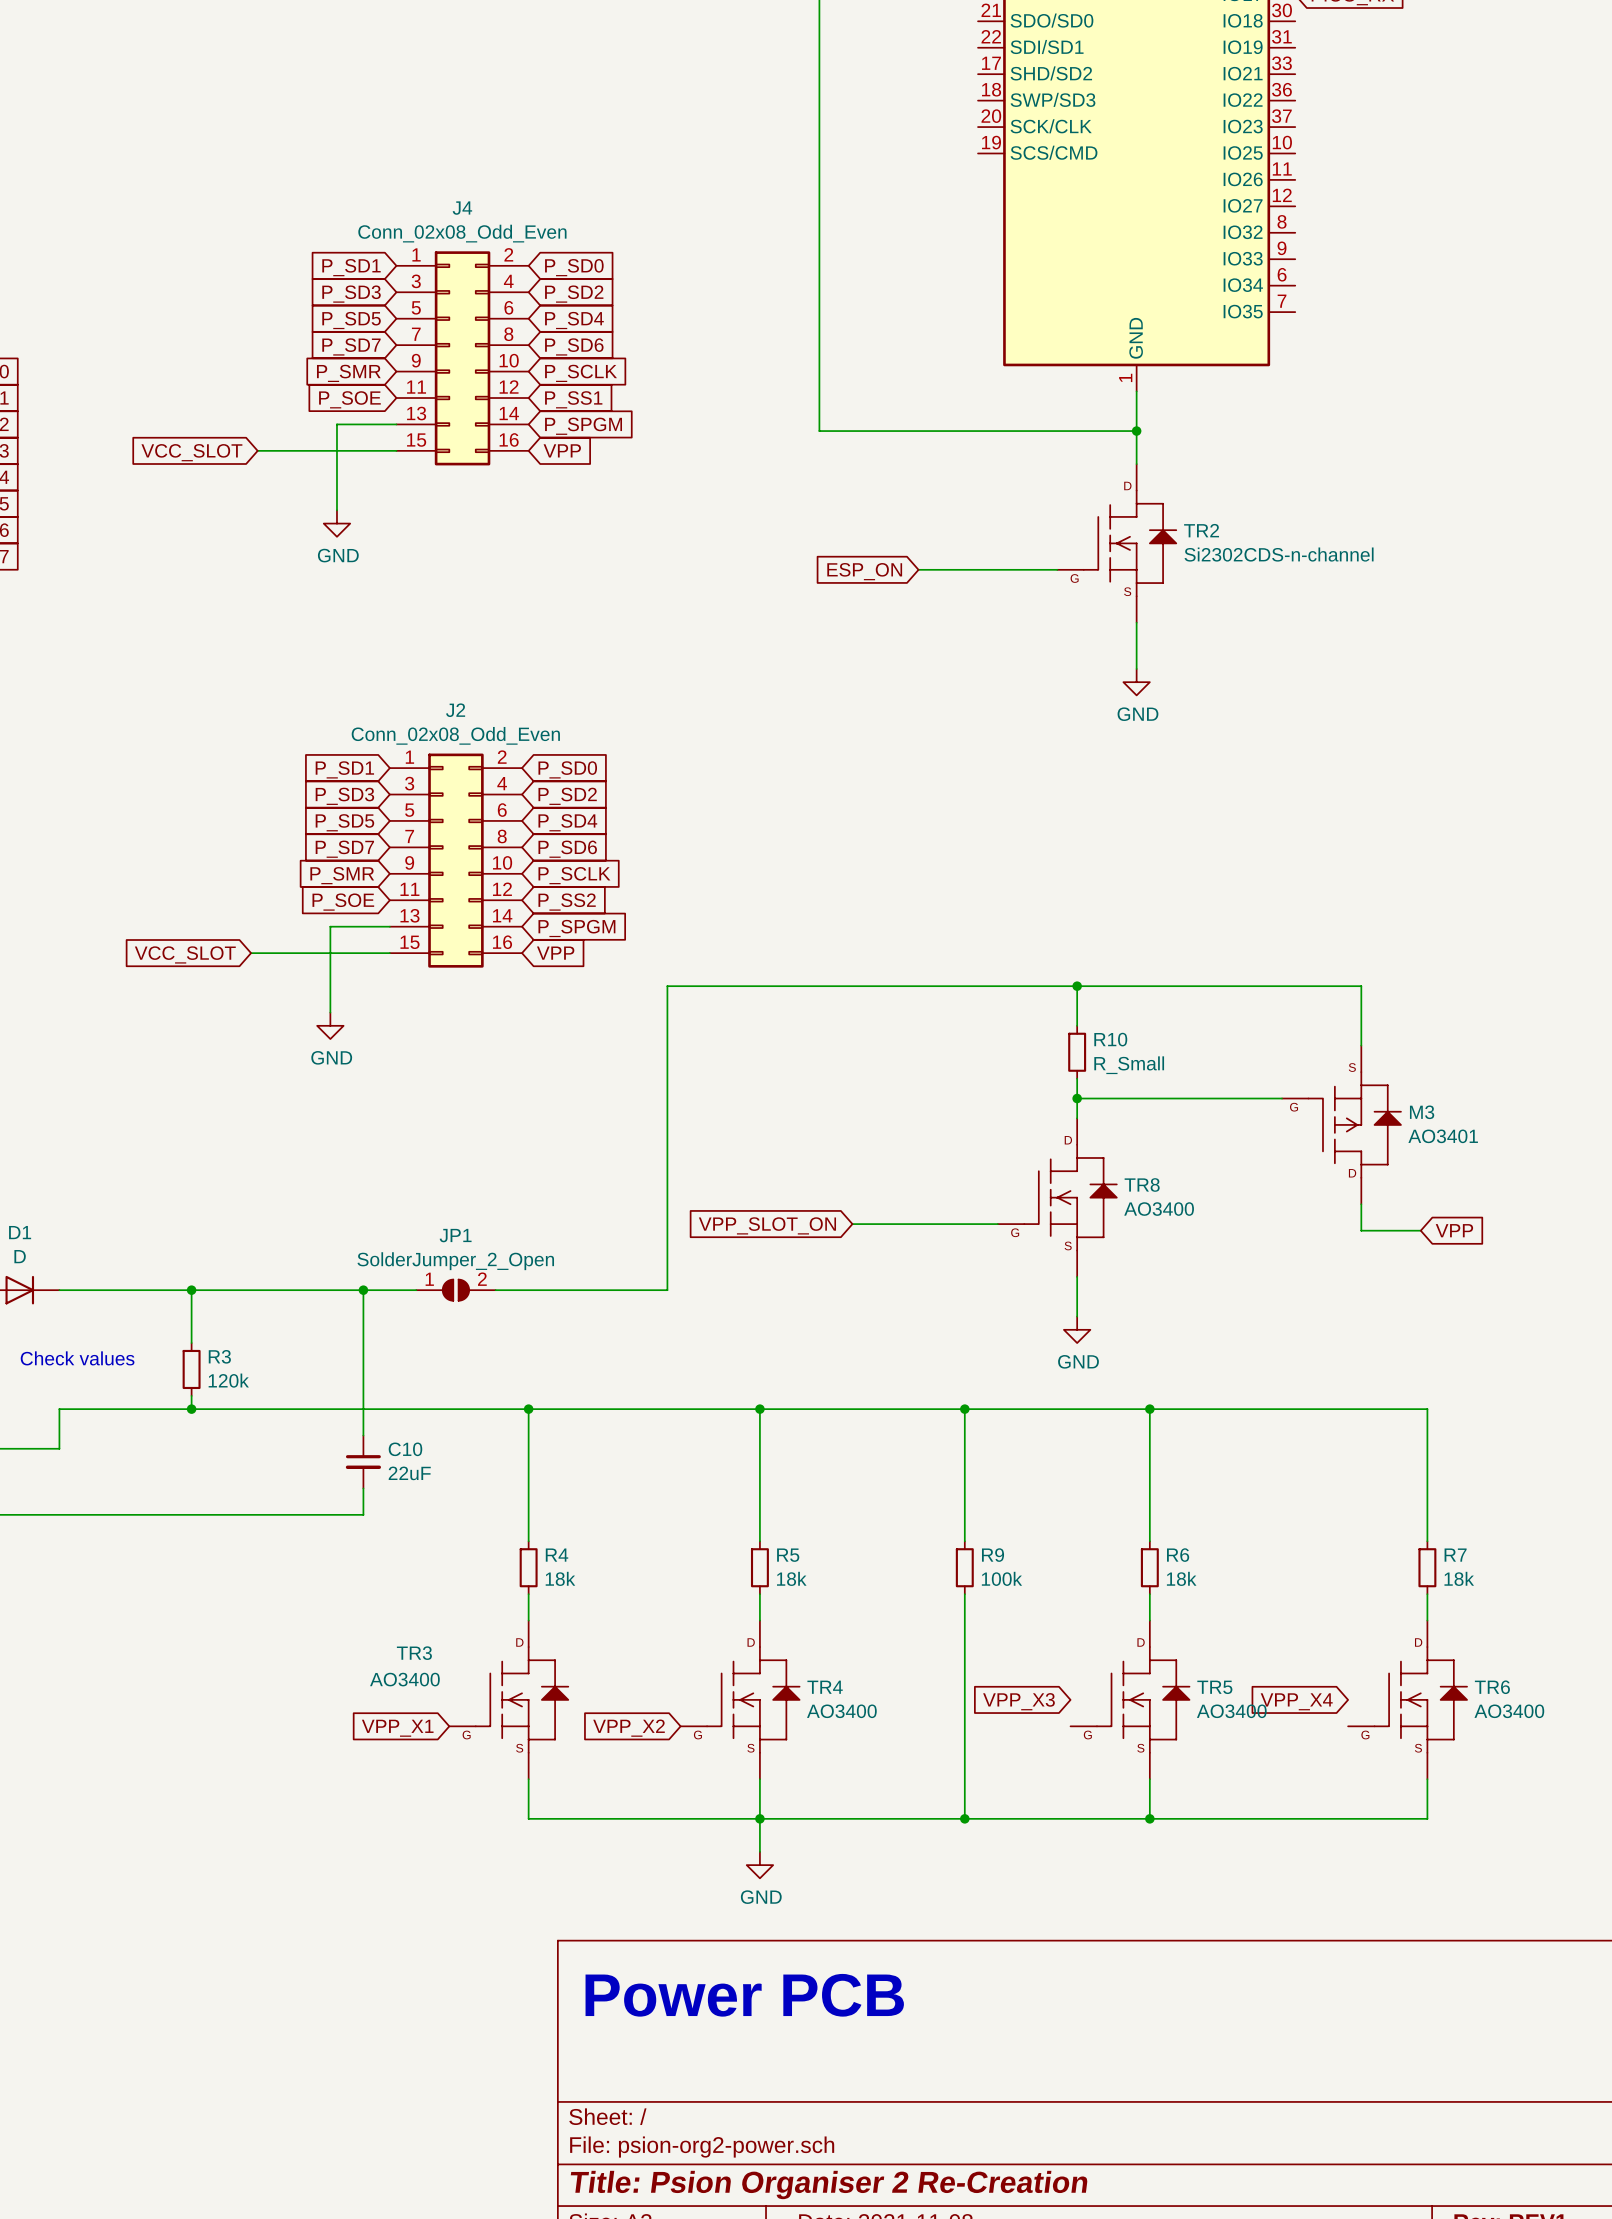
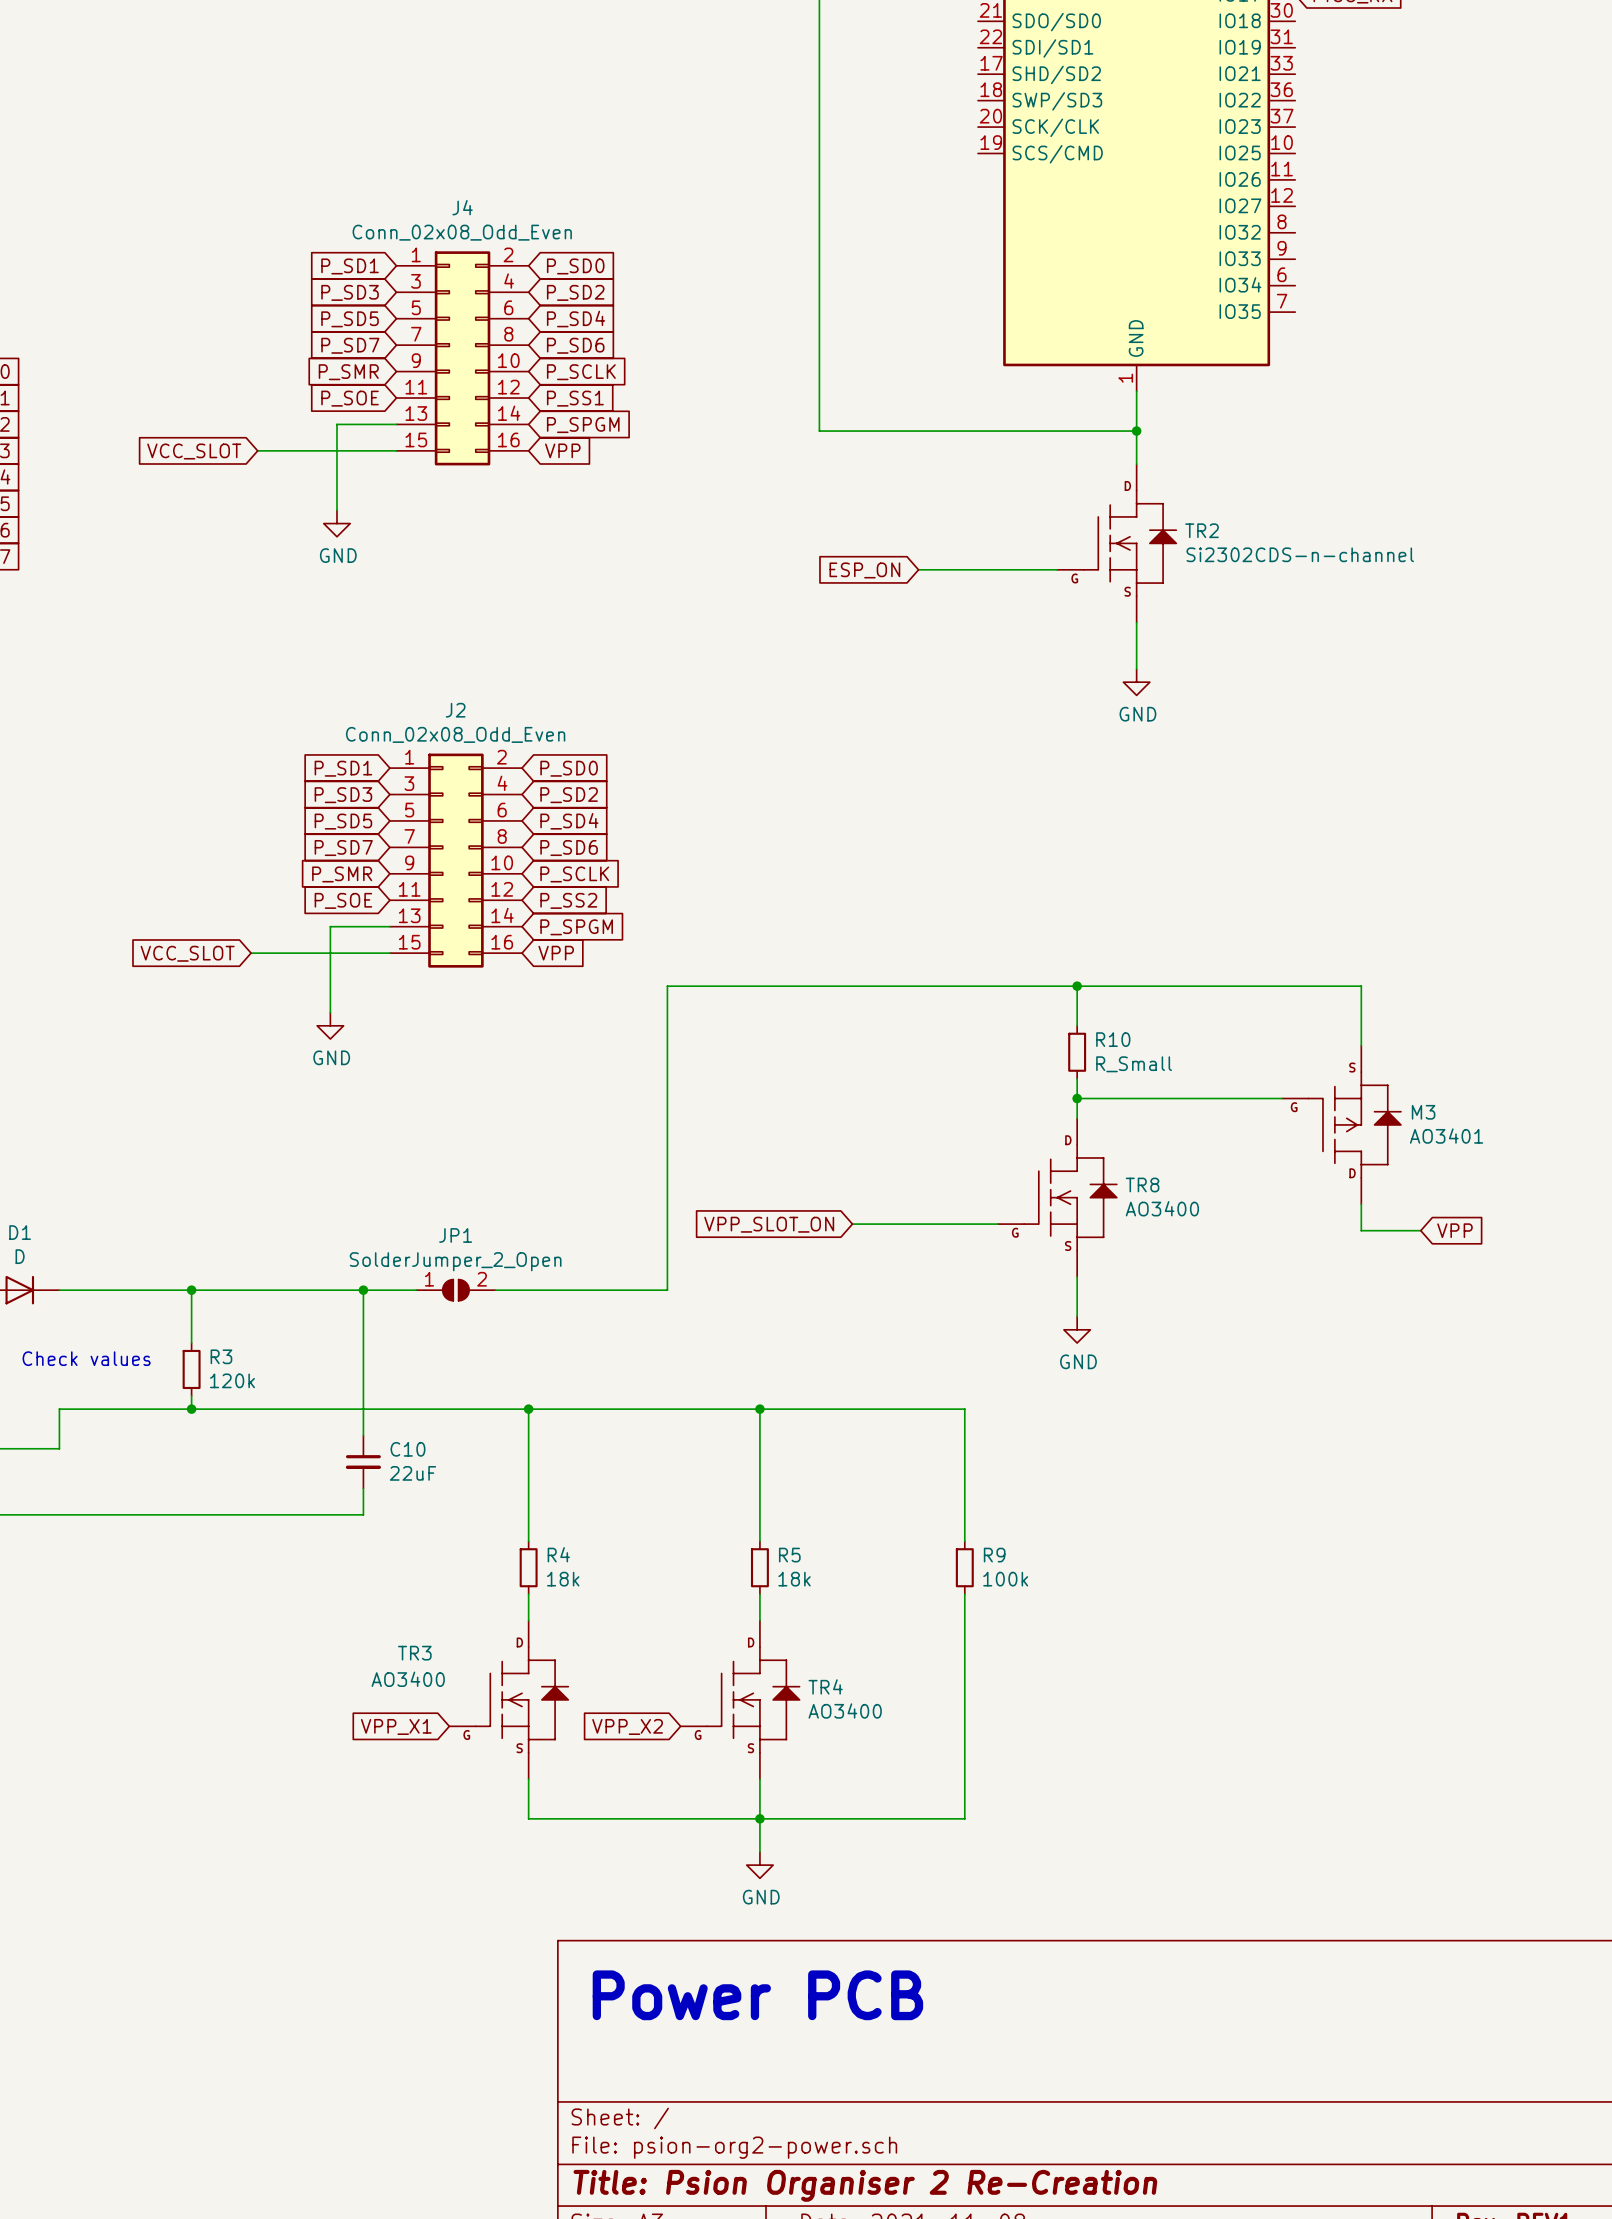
wire: (964, 1409) (1427, 1409) (1427, 1541) -> none
junction: (964, 1409) -> none
wire: (1149, 1409) (1149, 1541) -> none
junction: (1149, 1409) -> none
R6: 18k (1149, 1567) -> none
R7: 18k (1427, 1567) -> none
wire: (1149, 1594) (1149, 1620) -> none
wire: (1427, 1594) (1427, 1620) -> none
TR5: AO3400 (1130, 1699) -> none
TR6: AO3400 (1407, 1699) -> none
global label: VPP_X3 (1018, 1701) -> none
global label: VPP_X4 (1296, 1701) -> none
wire: (1149, 1779) (1149, 1818) -> none
wire: (1427, 1779) (1427, 1818) (964, 1818) -> none
junction: (964, 1818) -> none
junction: (1149, 1818) -> none

